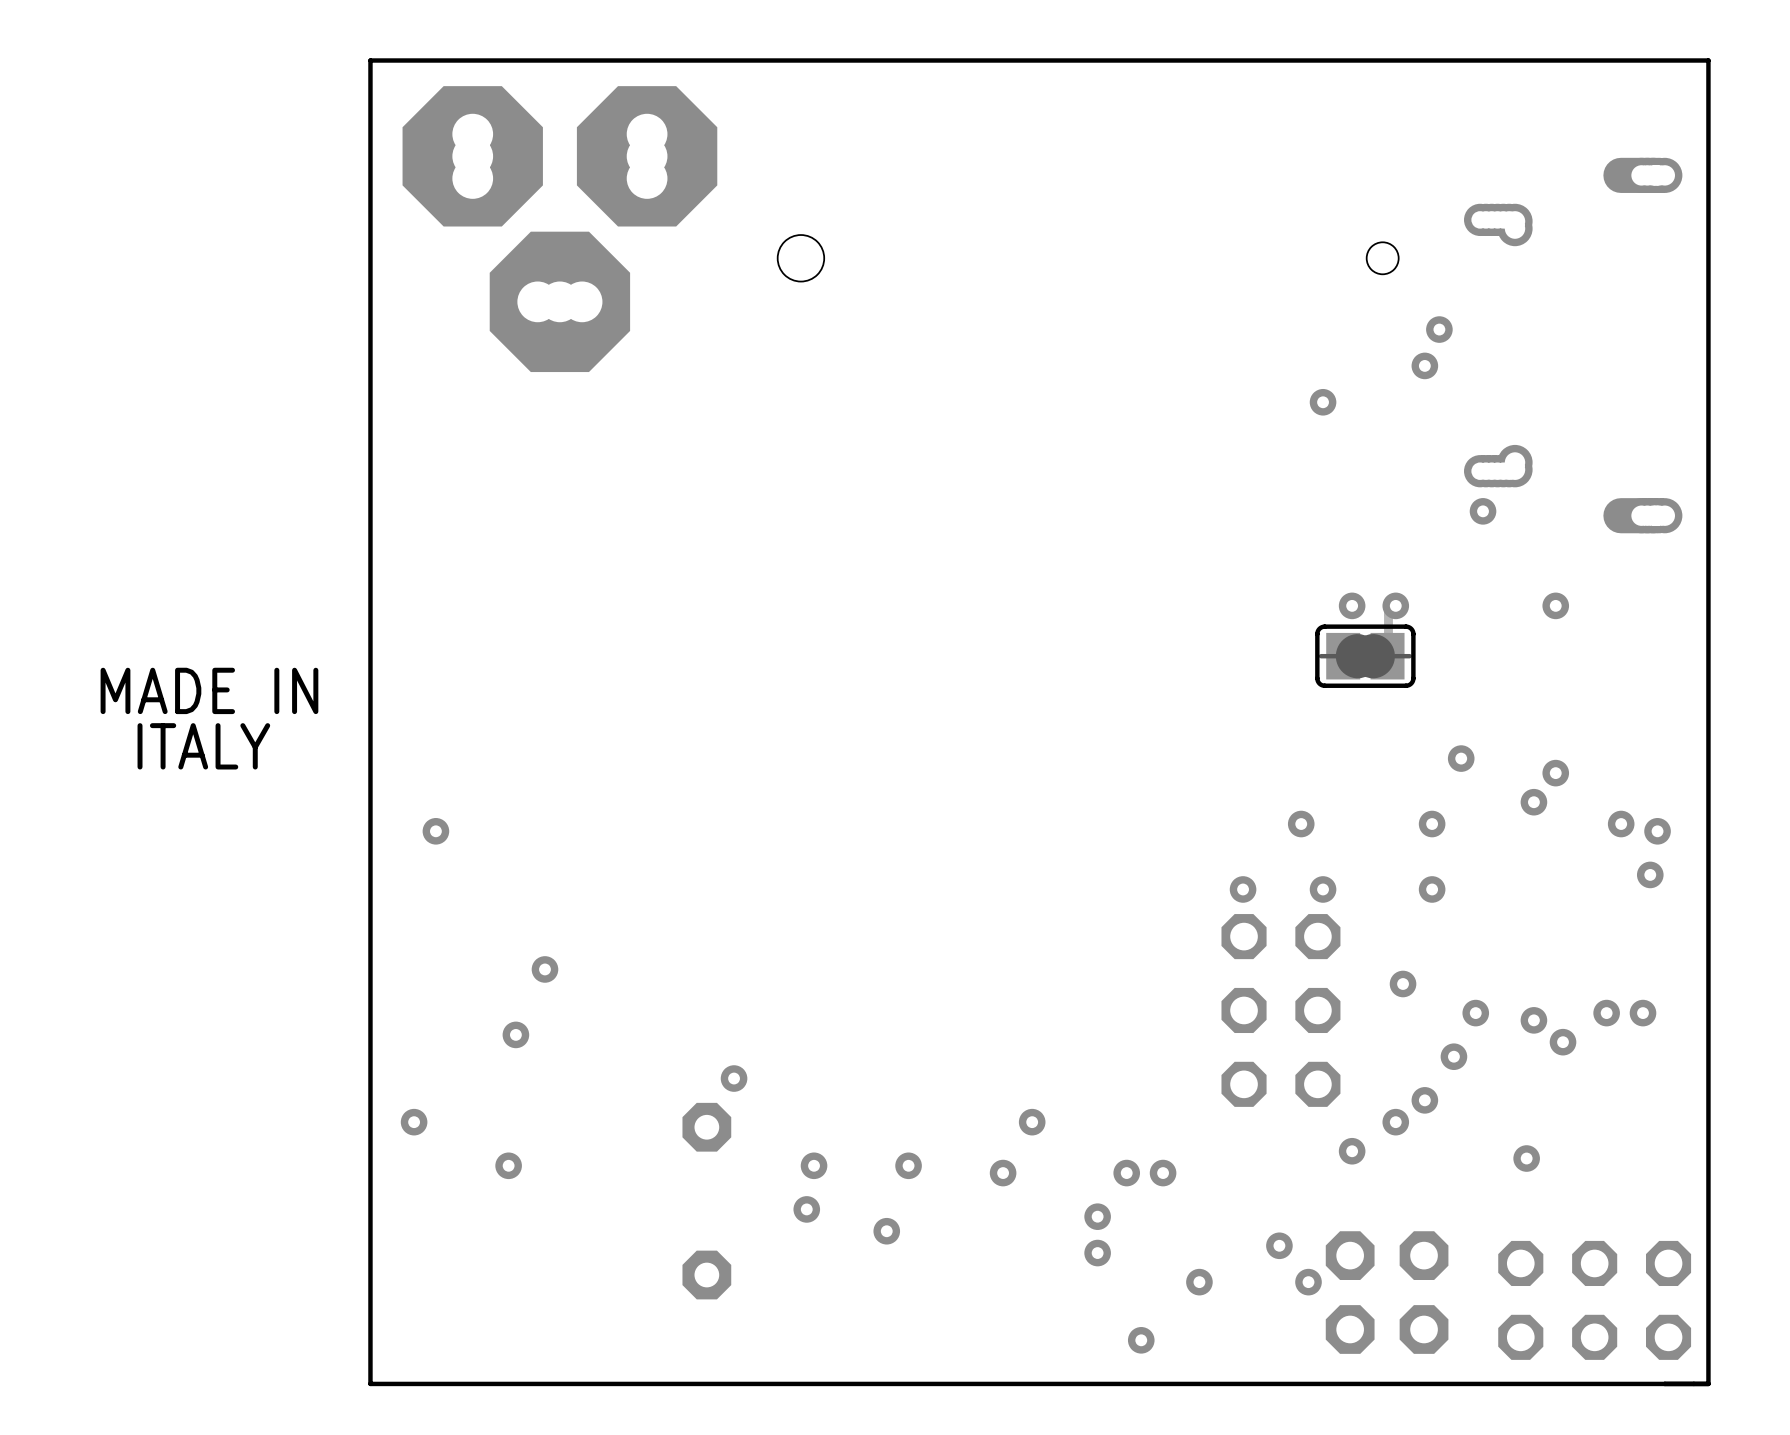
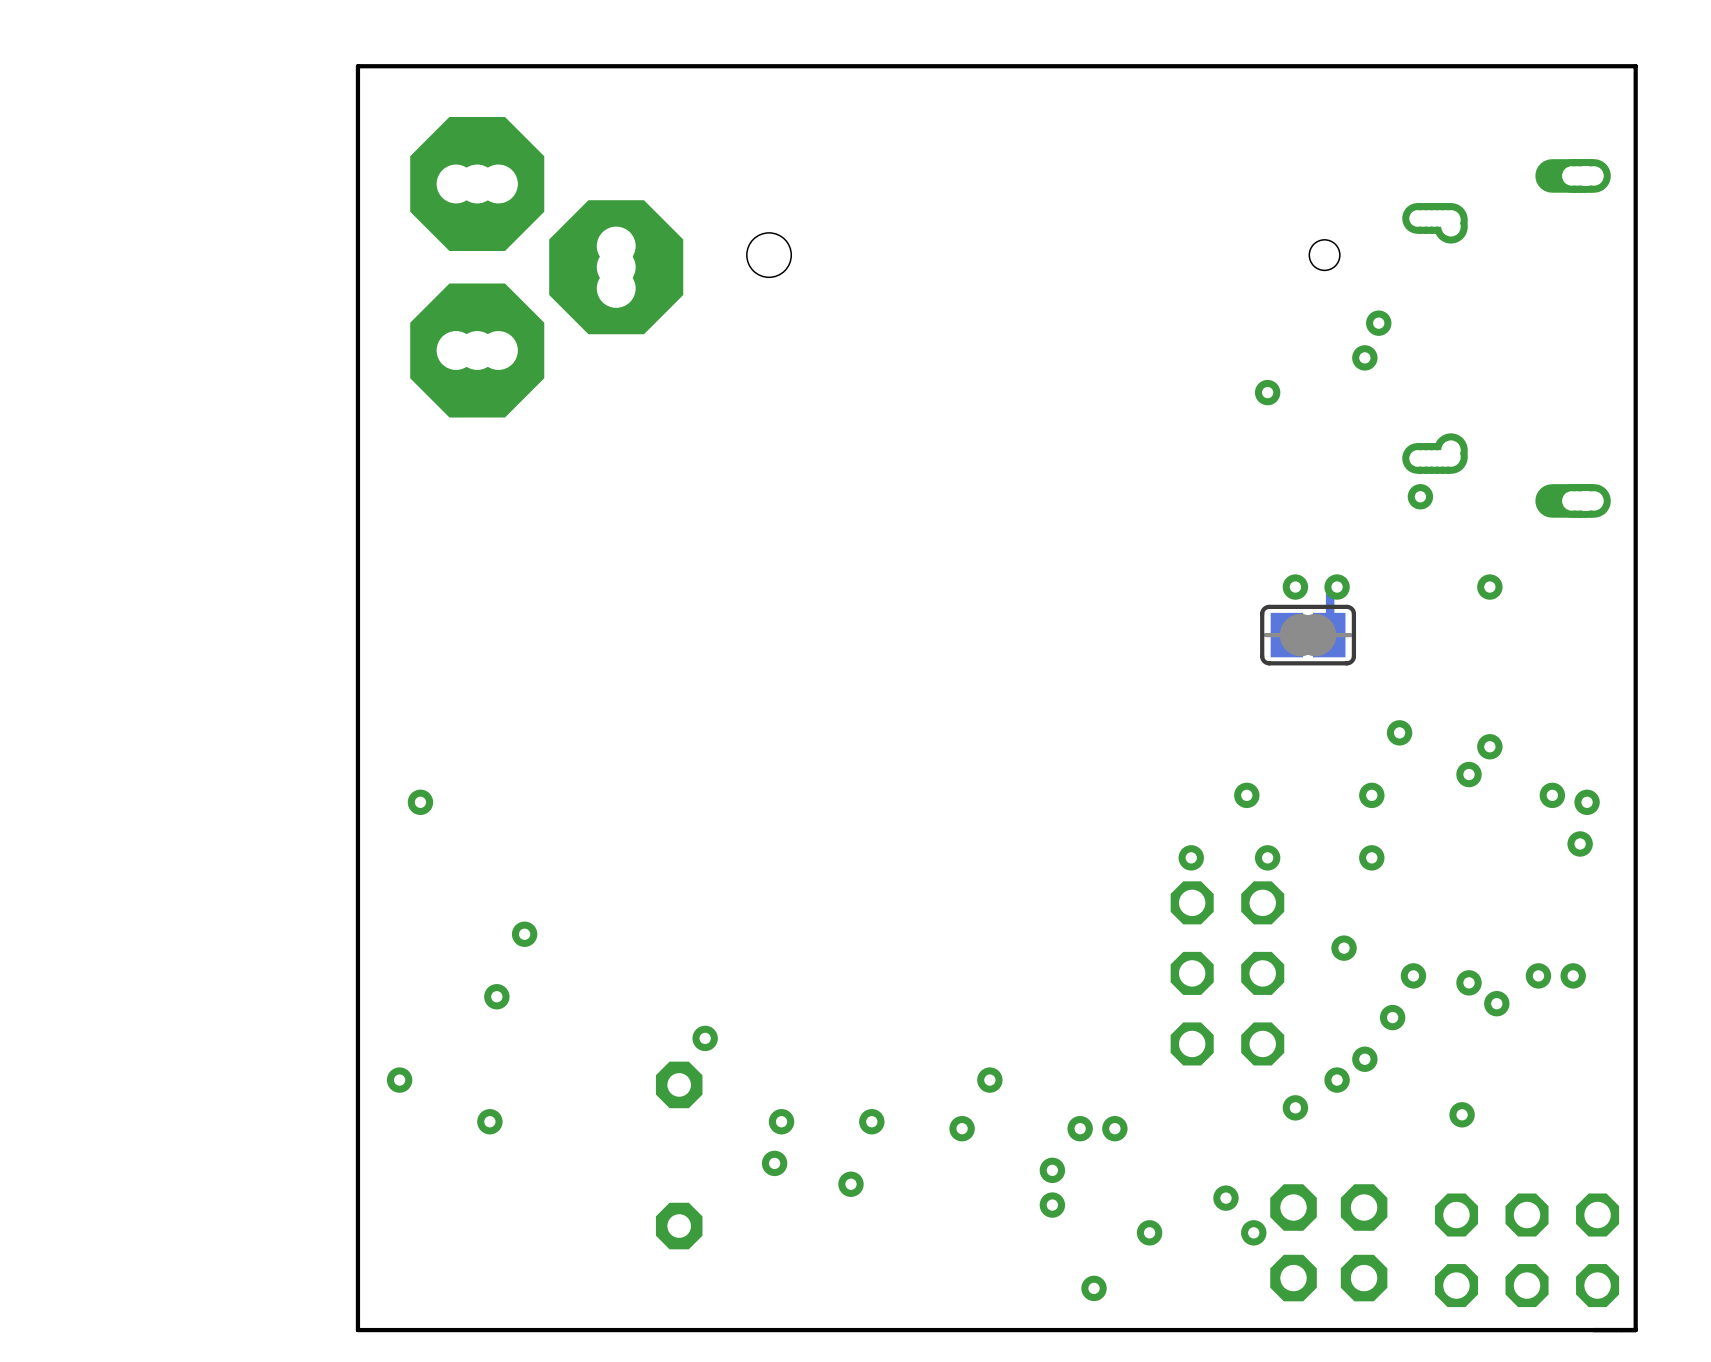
part rotation: 0° (559, 229) -> 90° counterclockwise (546, 267)
text: MADE IN (209, 690) -> none
text: ITALY (203, 746) -> none

